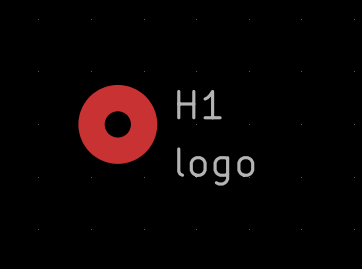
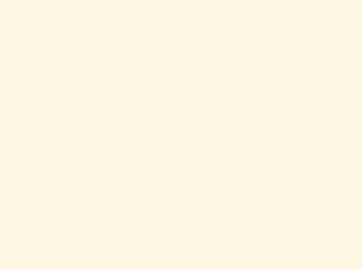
H1: logo (117, 124) -> none

